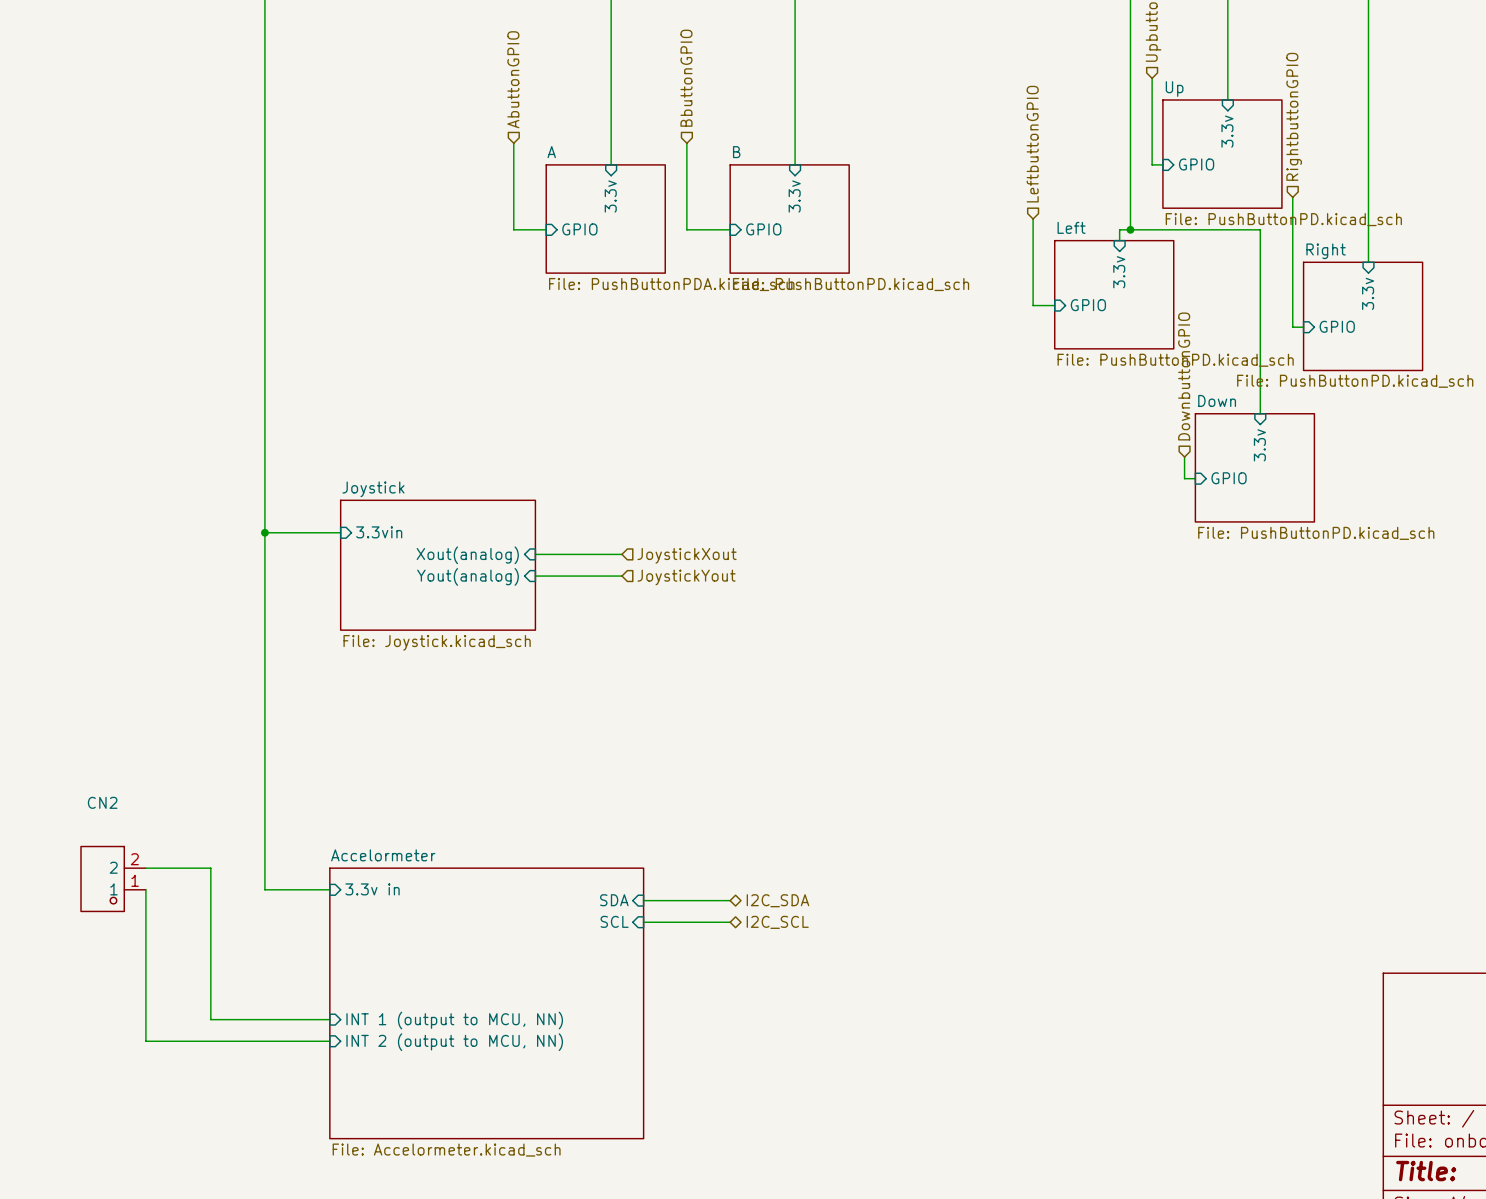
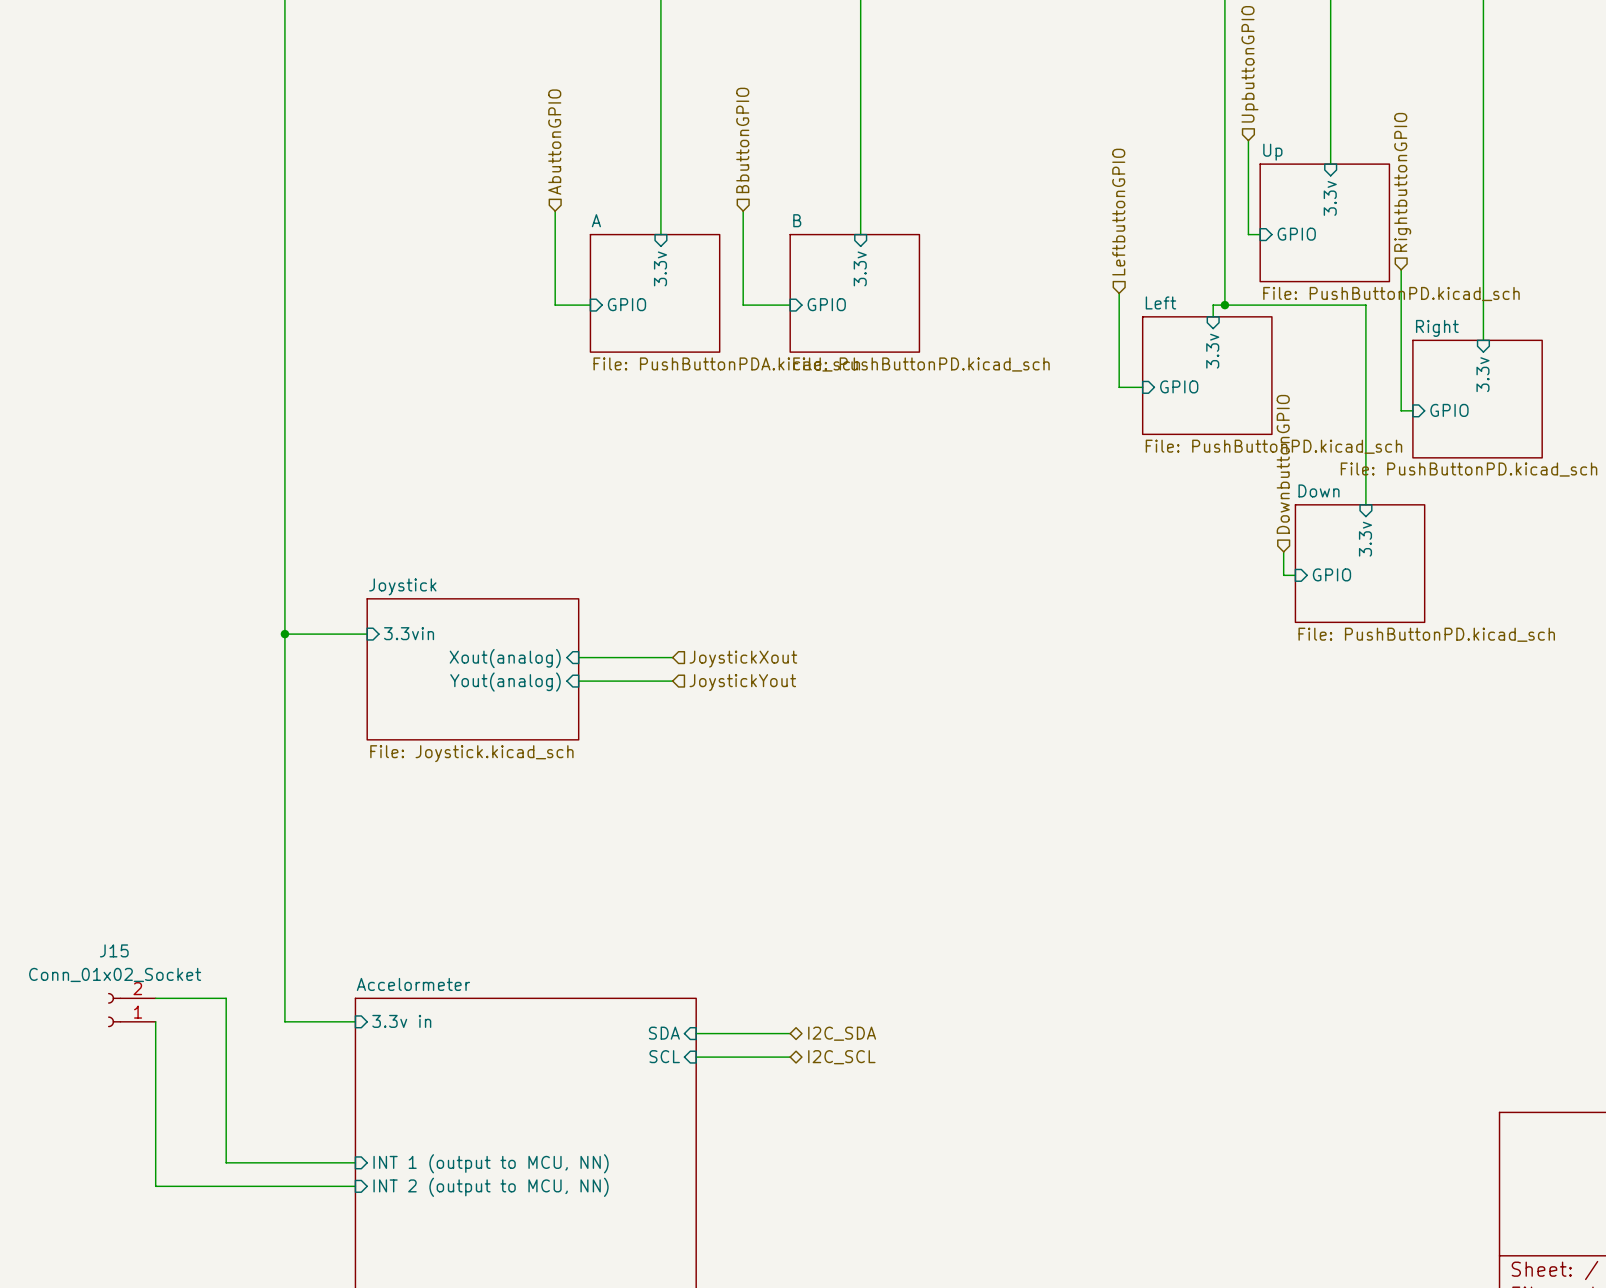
CN2: (113, 878) -> none
J15: none -> Conn_01x02_Socket (131, 1010)

